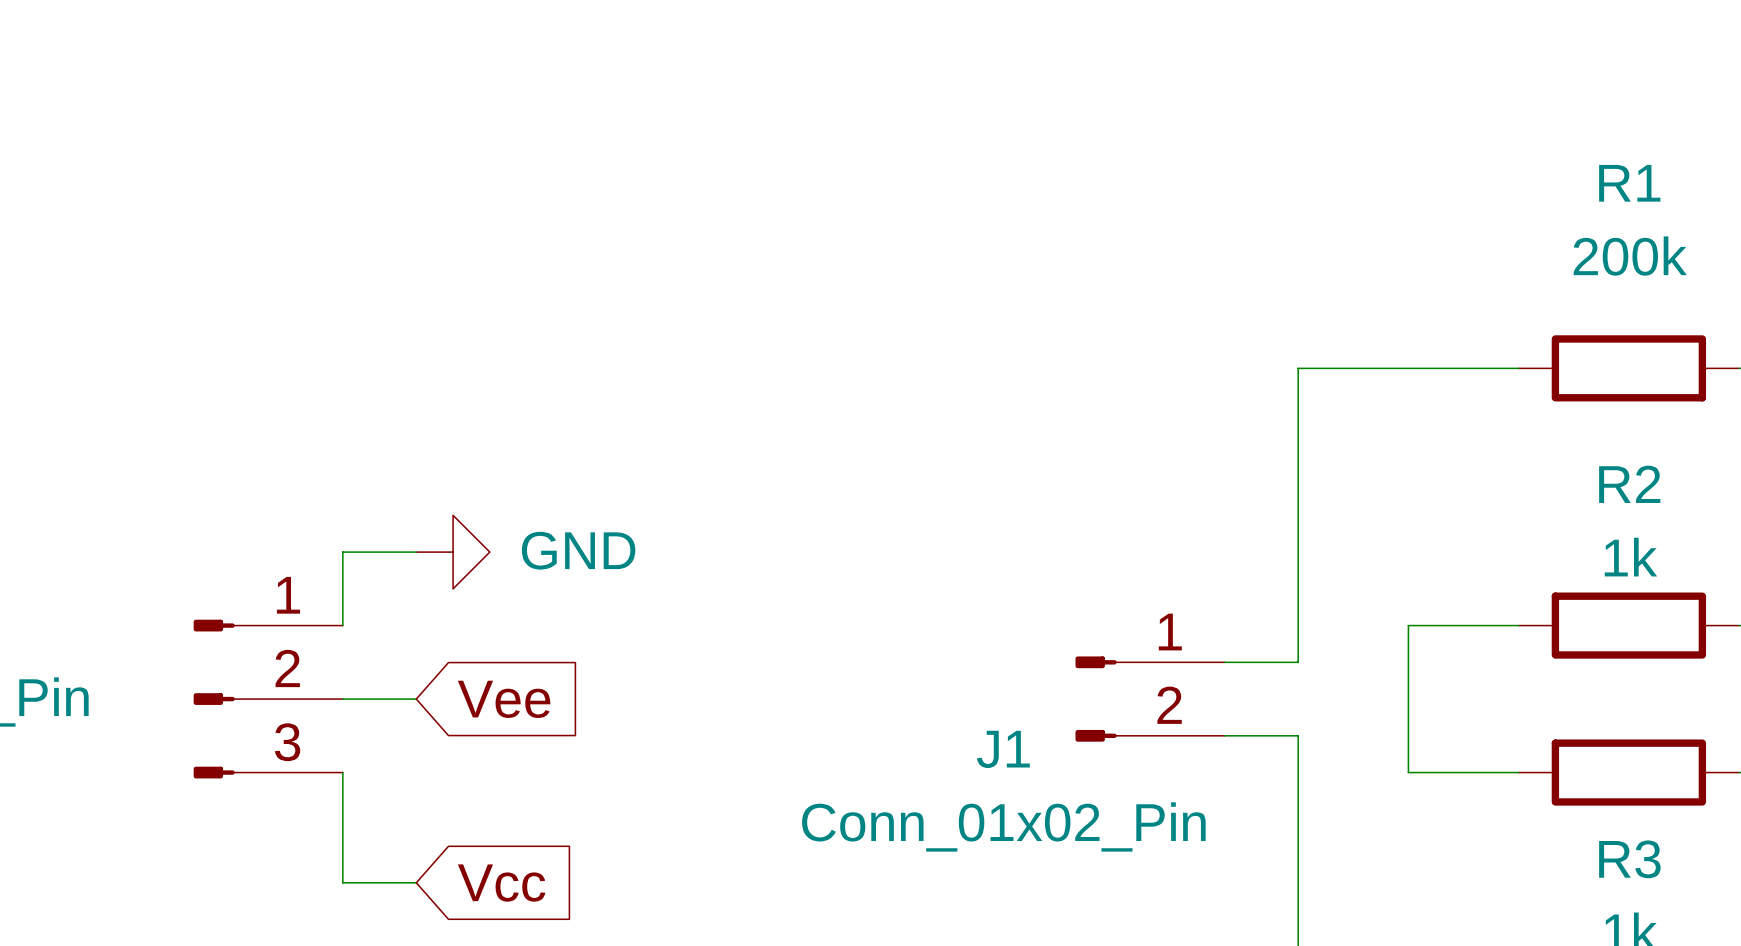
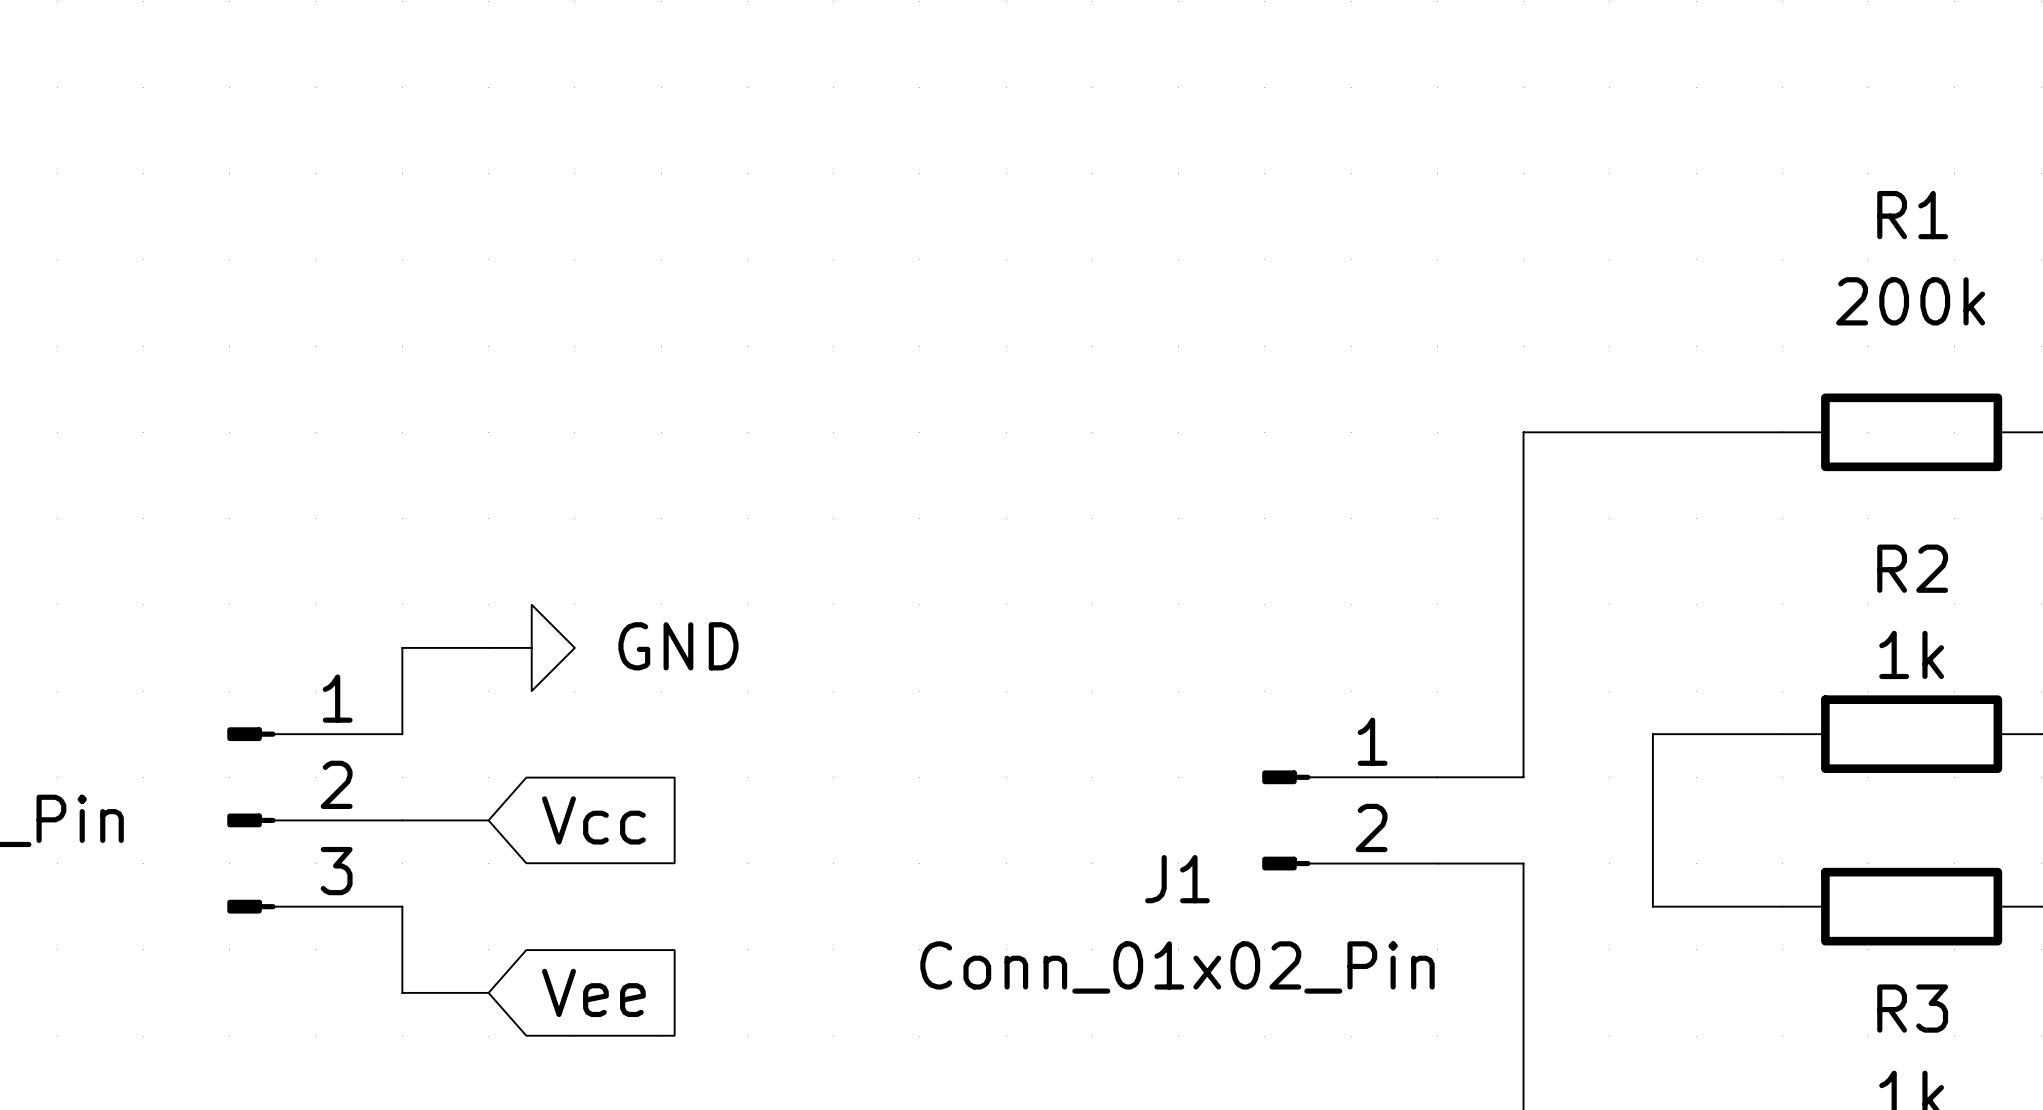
global label: Vee (504, 699) -> Vcc (593, 820)
wire: (342, 846) (342, 882) (416, 882) -> (402, 992) (488, 992)
global label: none -> Vee (593, 992)
global label: Vcc (501, 883) -> none

